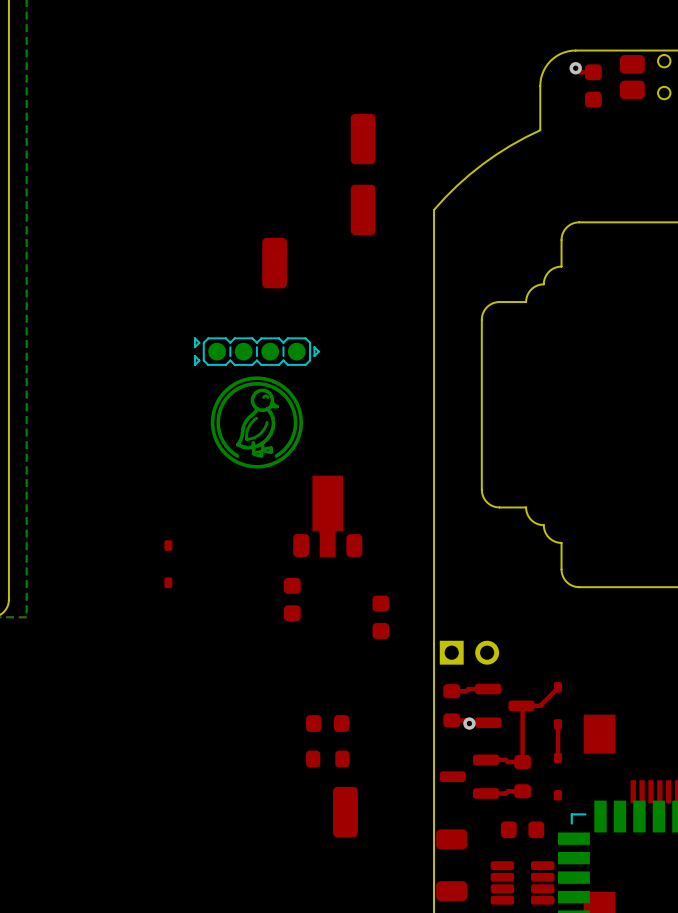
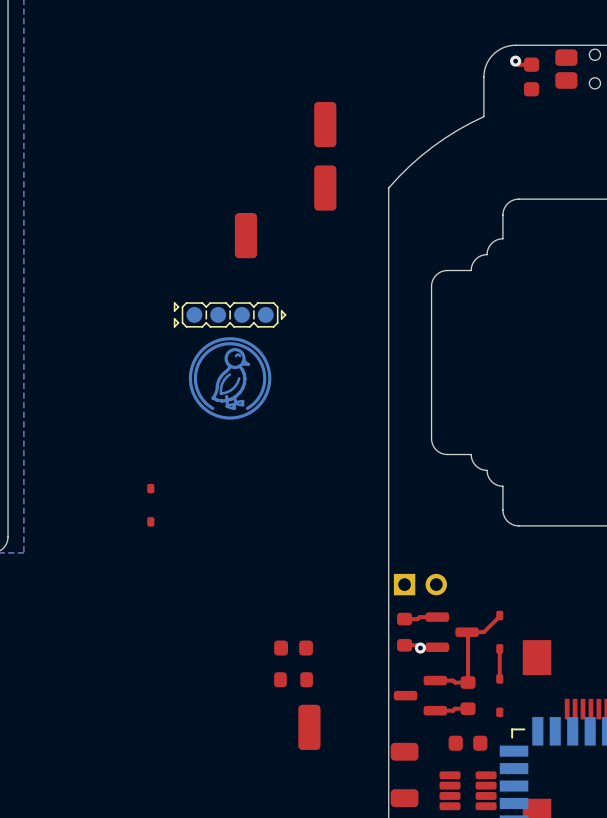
part: (327, 516) -> none
part: (292, 599) -> none
part: (380, 617) -> none

